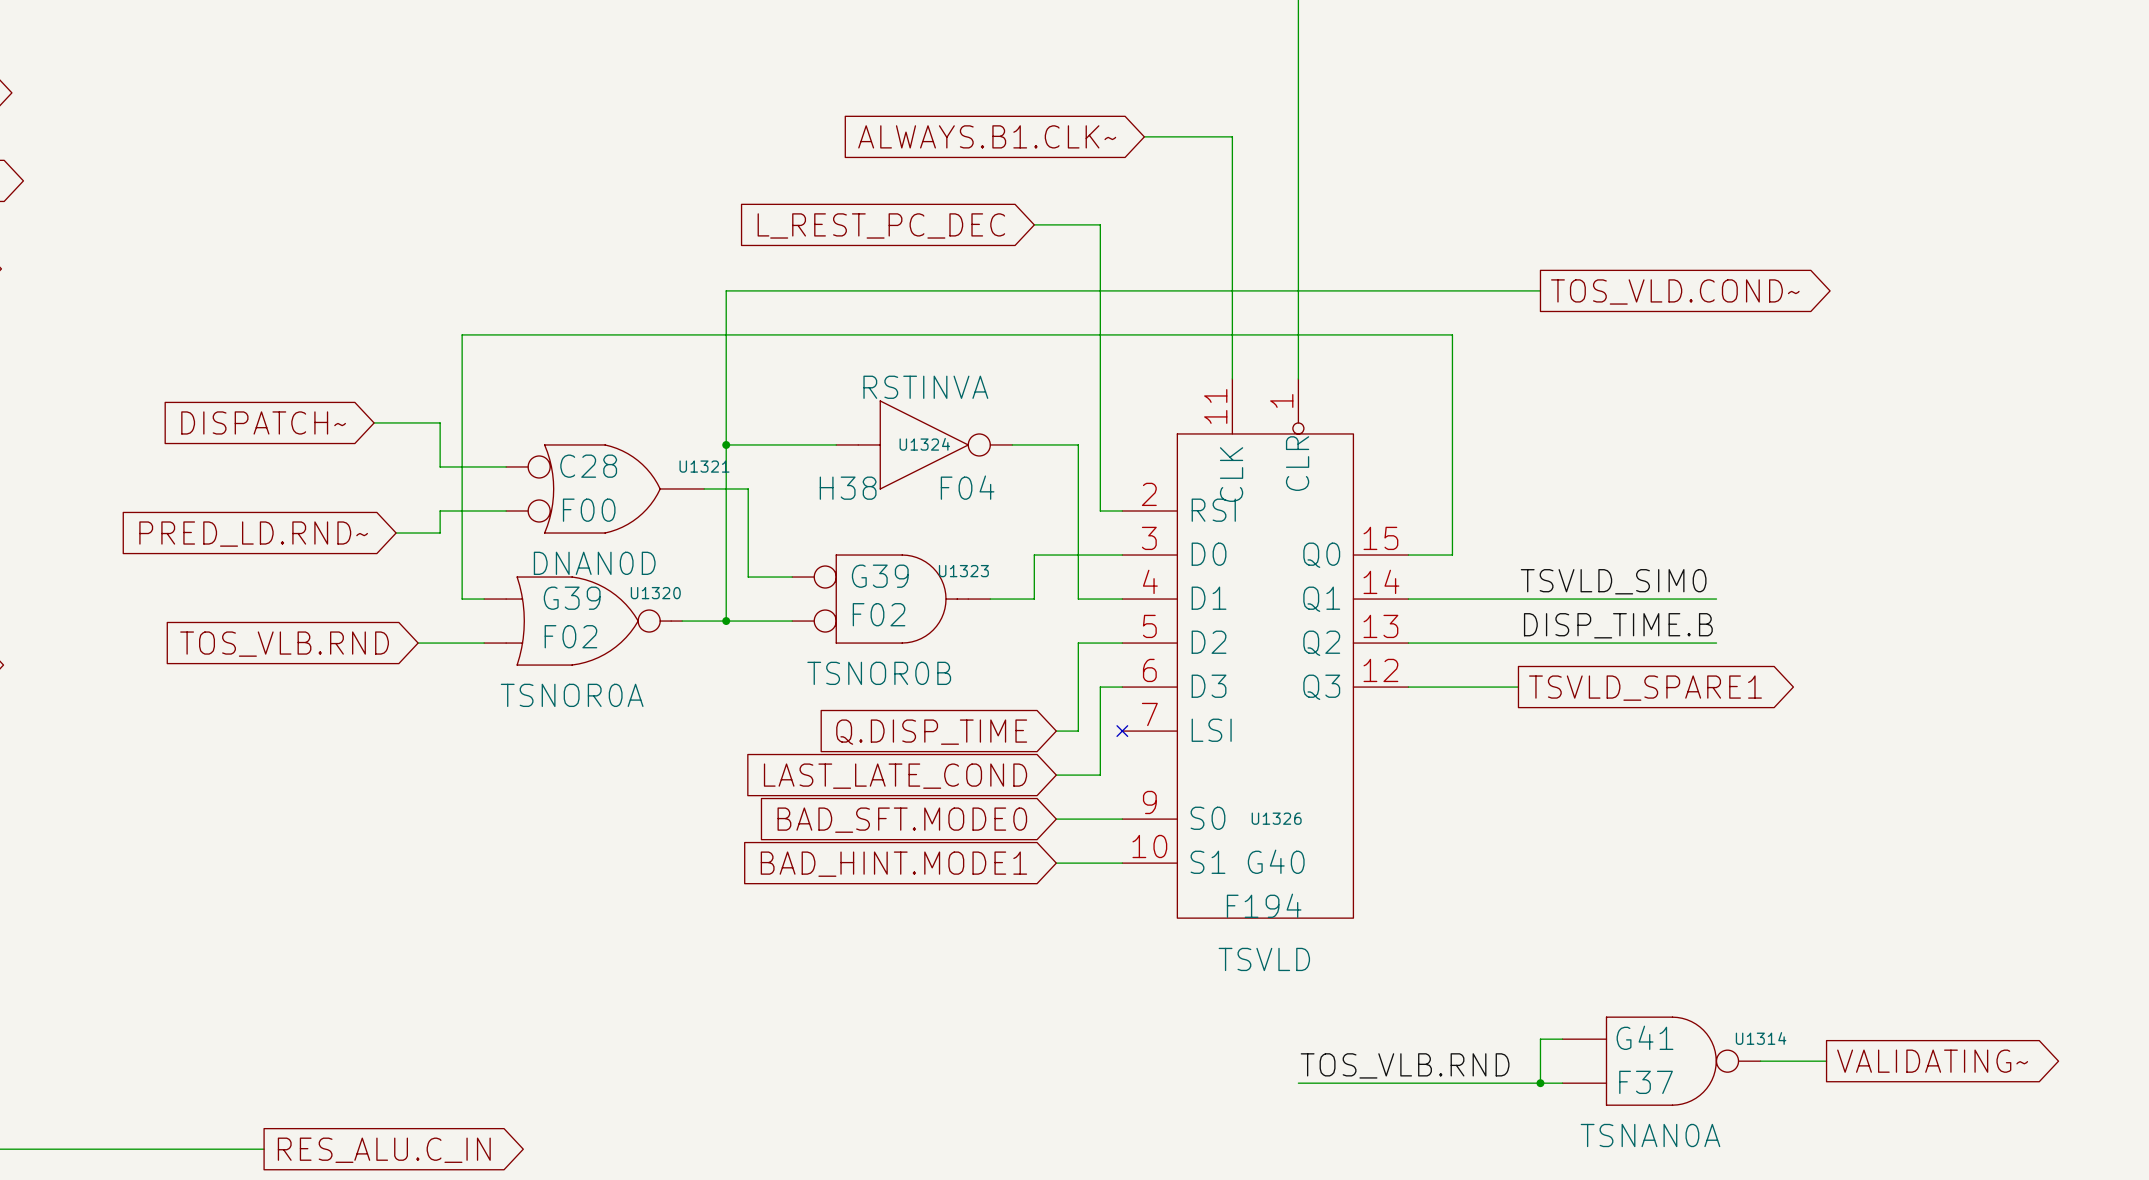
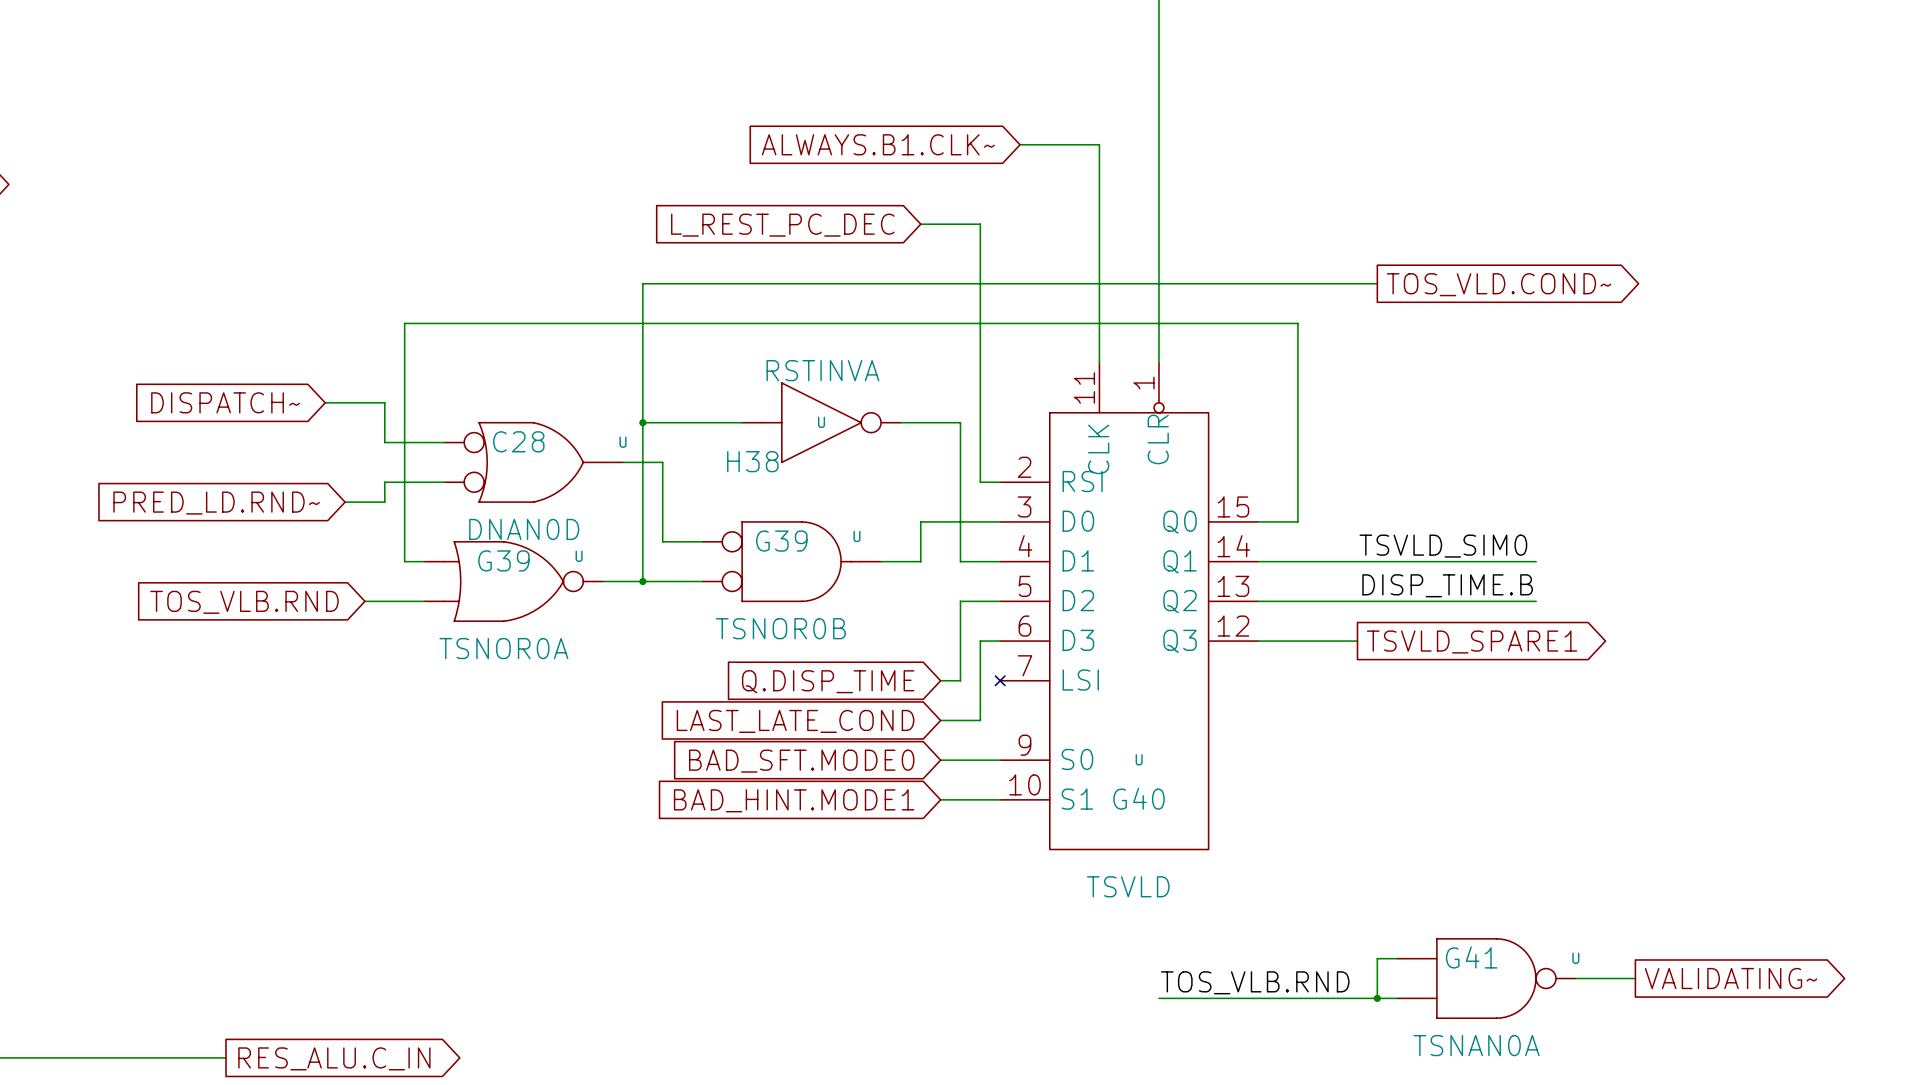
U1324 name: U1324 (924, 444) -> U (821, 422)
U1321 name: U1321 (704, 466) -> U (623, 442)
U1324 value: F04 (967, 487) -> none
U1321 value: F00 (589, 510) -> none
U1323 name: U1323 (963, 571) -> U (857, 536)
U1320 name: U1320 (655, 593) -> U (579, 556)
U1323 value: F02 (879, 614) -> none
U1320 value: F02 (570, 636) -> none
U1326 name: U1326 (1276, 818) -> U (1139, 759)
U1326 value: F194 (1264, 905) -> none
U1314 name: U1314 (1761, 1038) -> U (1575, 958)
U1314 value: F37 (1646, 1082) -> none

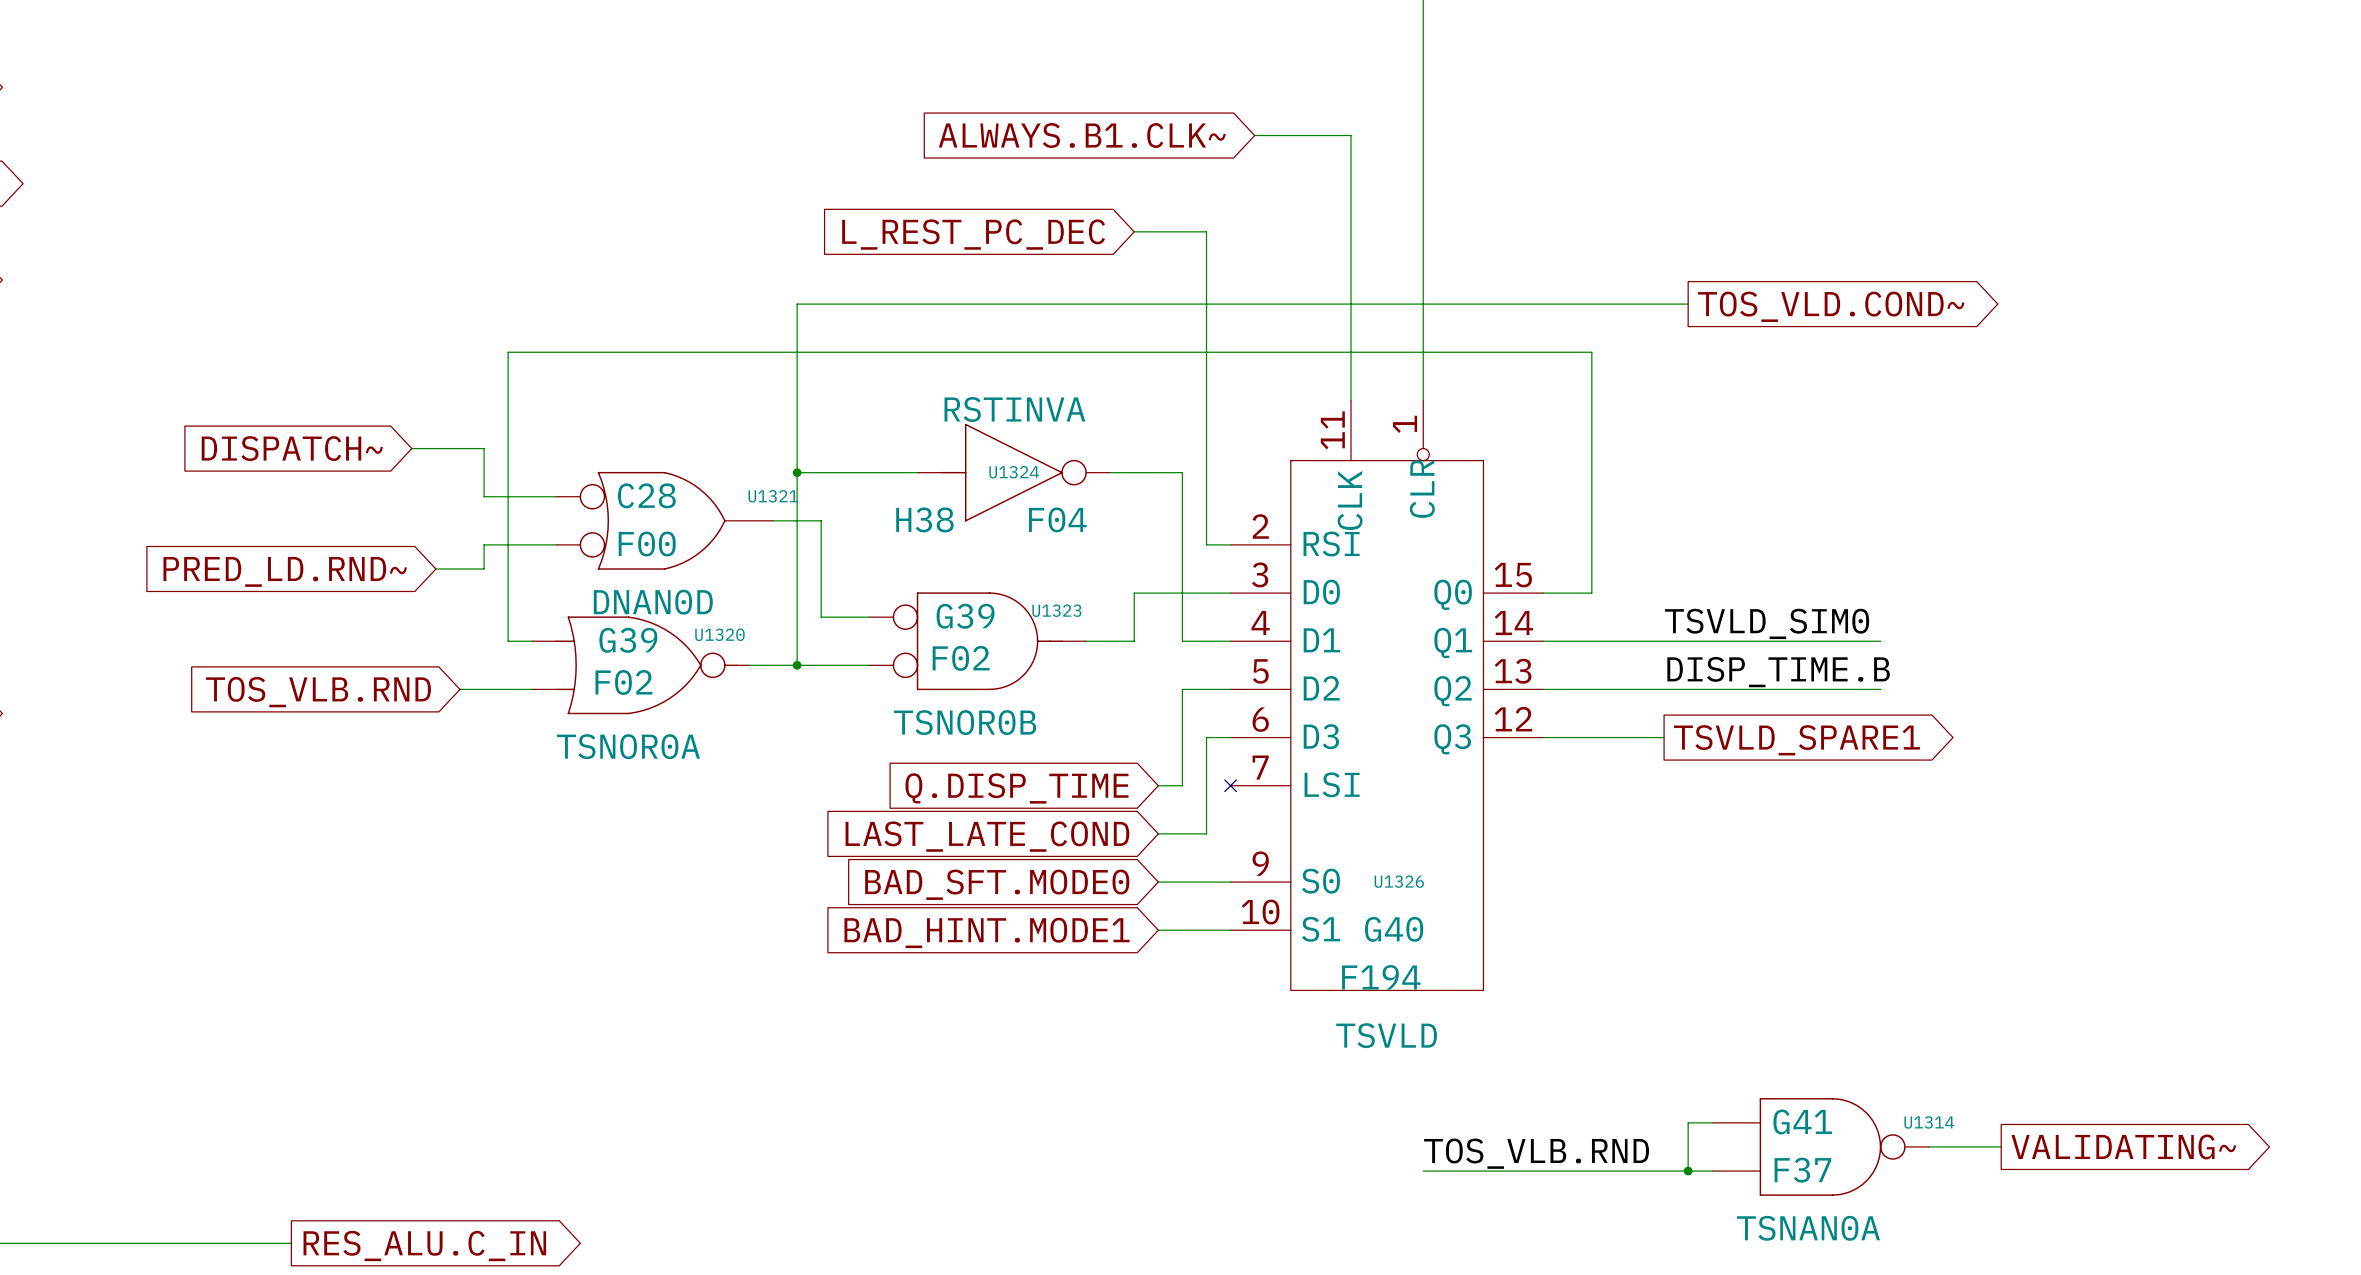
U name: U (821, 422) -> U1324 (1014, 472)
U name: U (623, 442) -> U1321 (773, 496)
U value: none -> F04 (1057, 519)
U value: none -> F00 (647, 544)
U name: U (857, 536) -> U1323 (1056, 610)
U name: U (579, 556) -> U1320 (719, 634)
U value: none -> F02 (961, 658)
U value: none -> F02 (623, 682)
U name: U (1139, 759) -> U1326 (1399, 881)
U value: none -> F194 (1381, 977)
U name: U (1575, 958) -> U1314 (1929, 1122)
U value: none -> F37 (1802, 1170)

